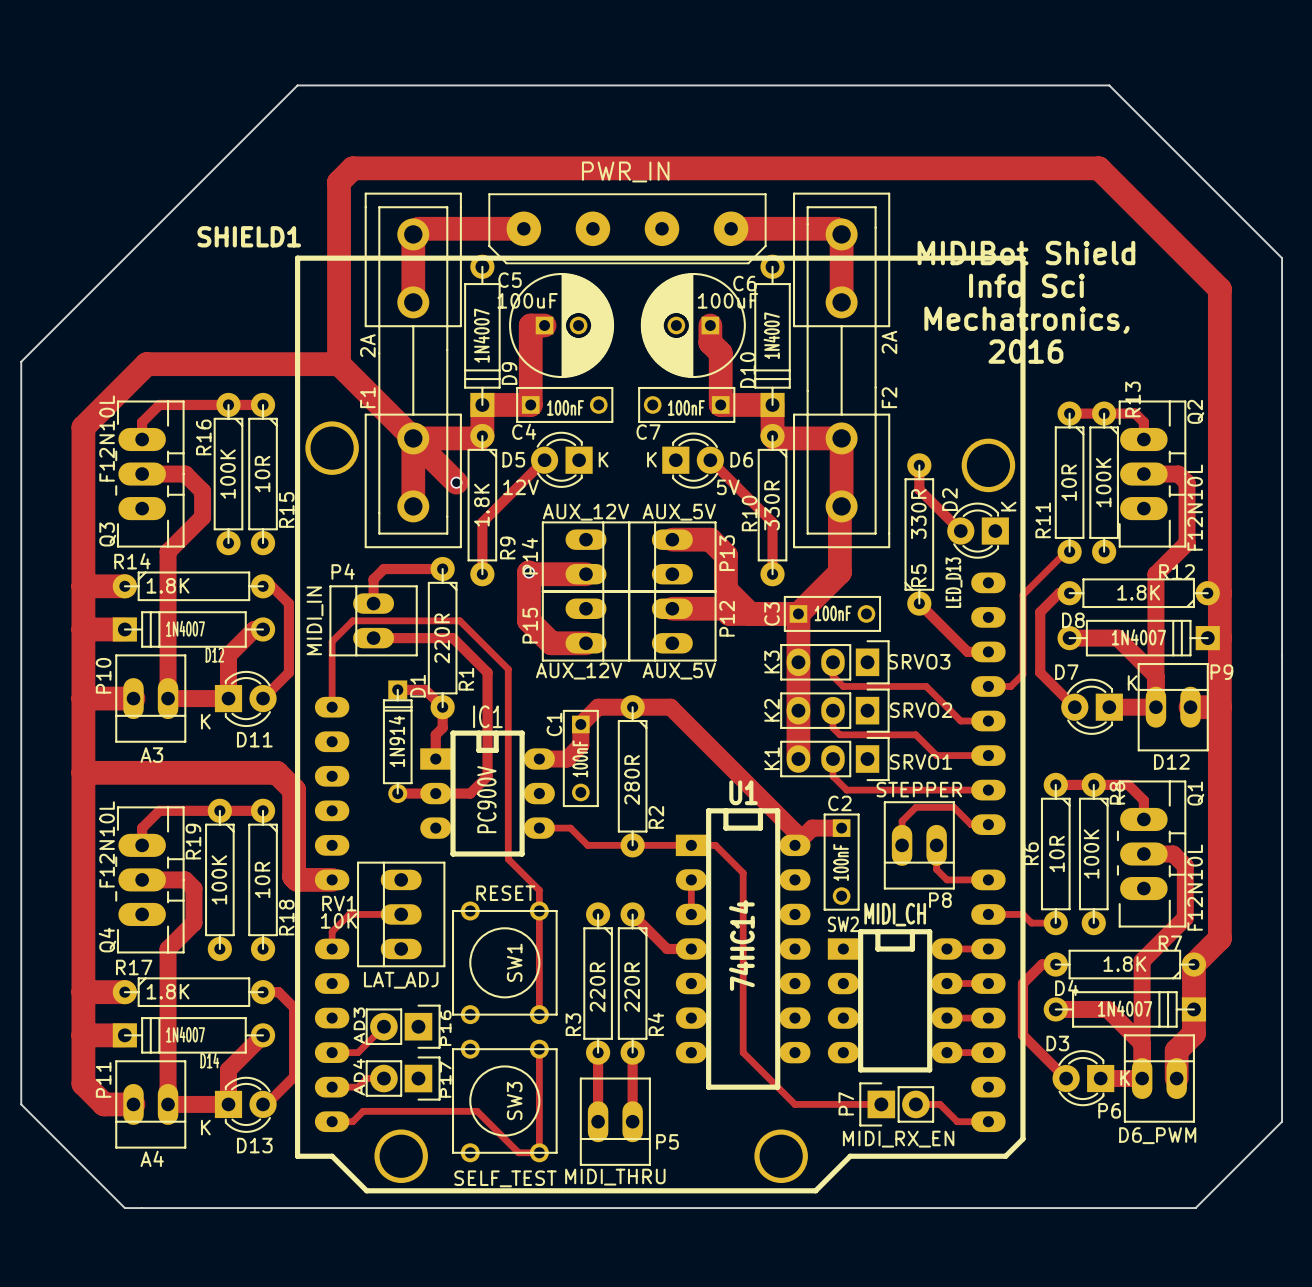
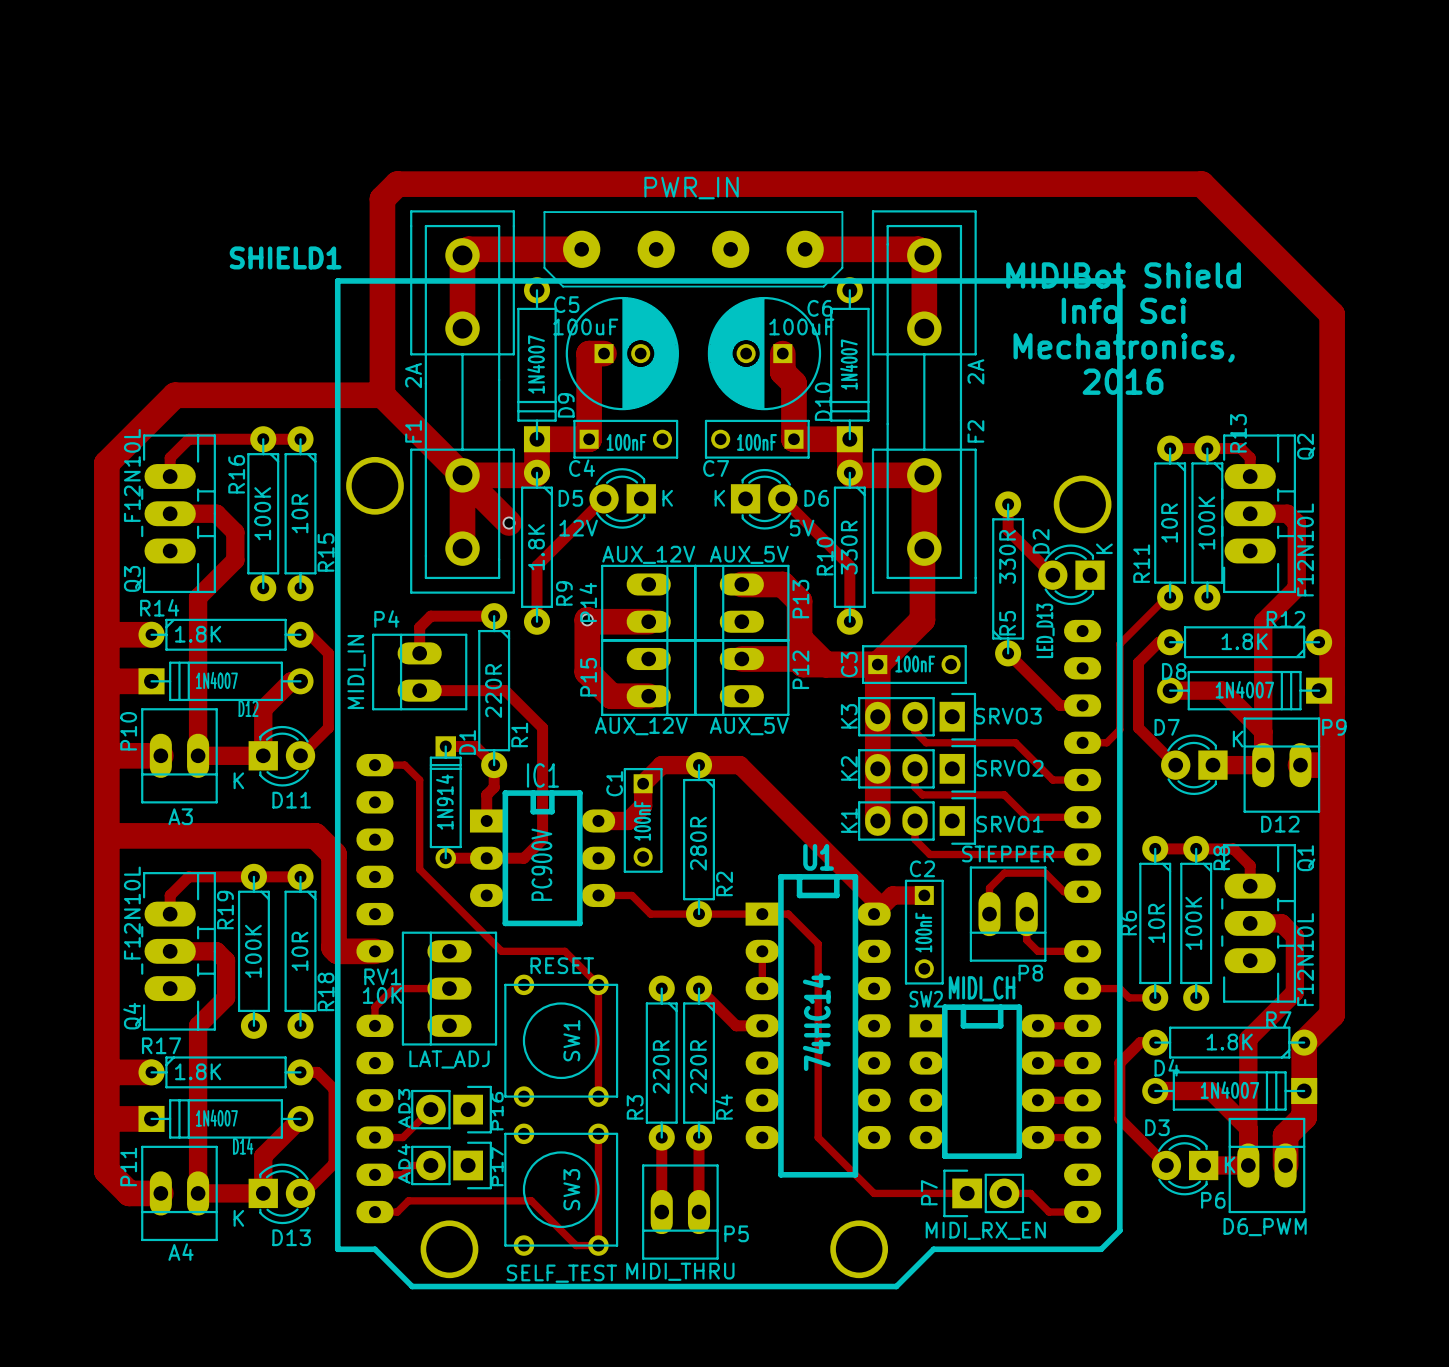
board edge: (297, 85) (1109, 85) (1282, 258) (1282, 1121) (1195, 1208) (124, 1208) (21, 1104) (21, 361) (297, 85) -> none
track: (332, 707) (332, 641) (352, 620) (459, 620) (508, 669) (508, 859) (539, 890) (539, 911) -> (374, 765) (404, 765) (419, 780) (419, 869) (501, 951) (564, 951) (598, 984)

